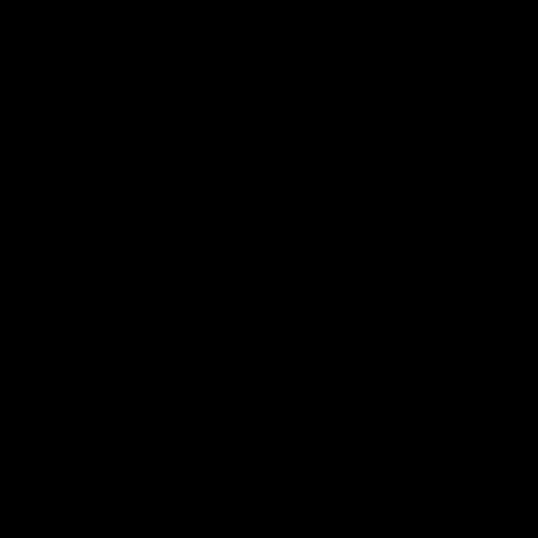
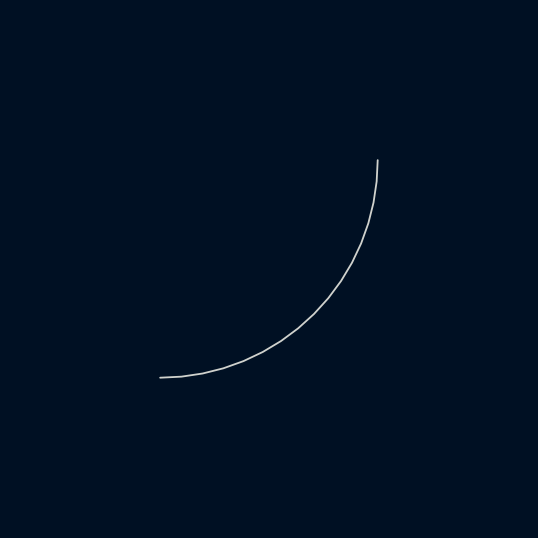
board edge: none -> (377, 160) (373, 202) (361, 243) (341, 281) (313, 313) (281, 341) (243, 361) (202, 373) (160, 377)

